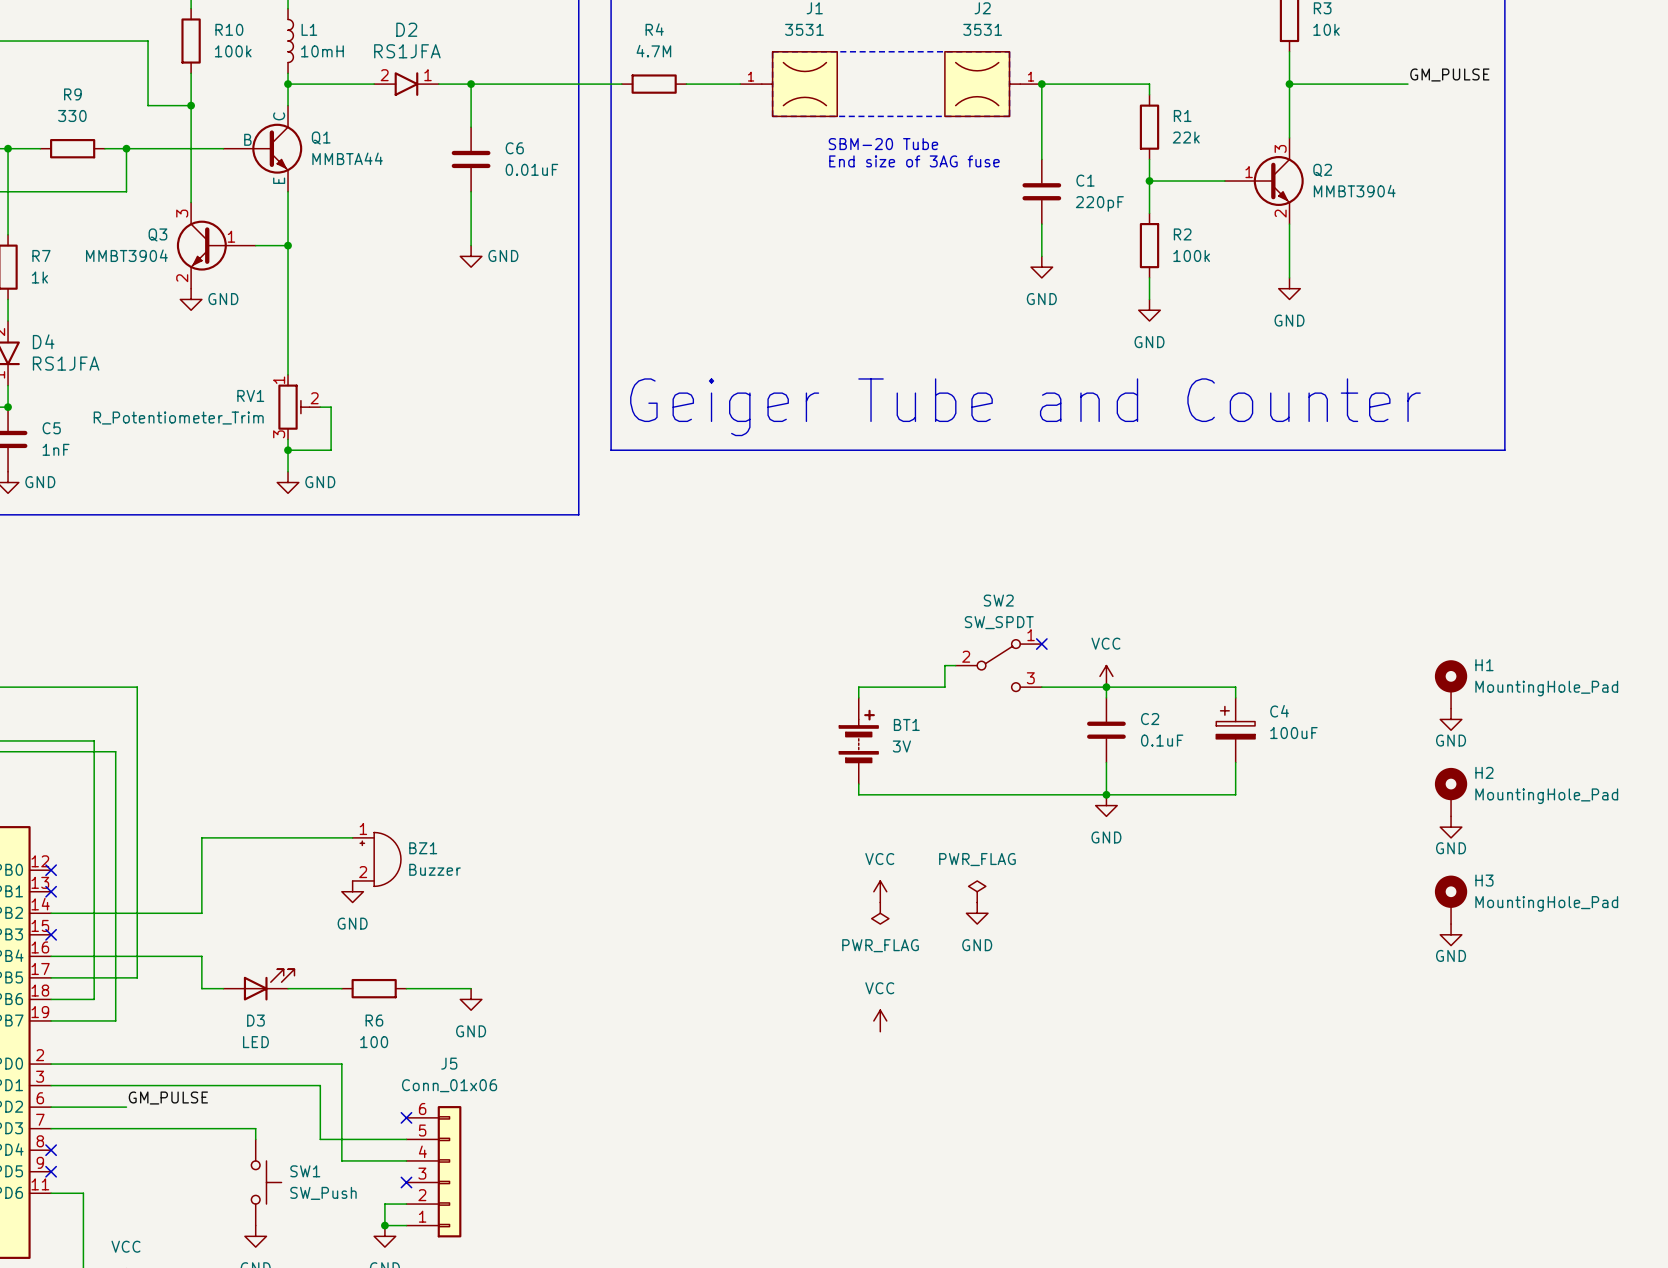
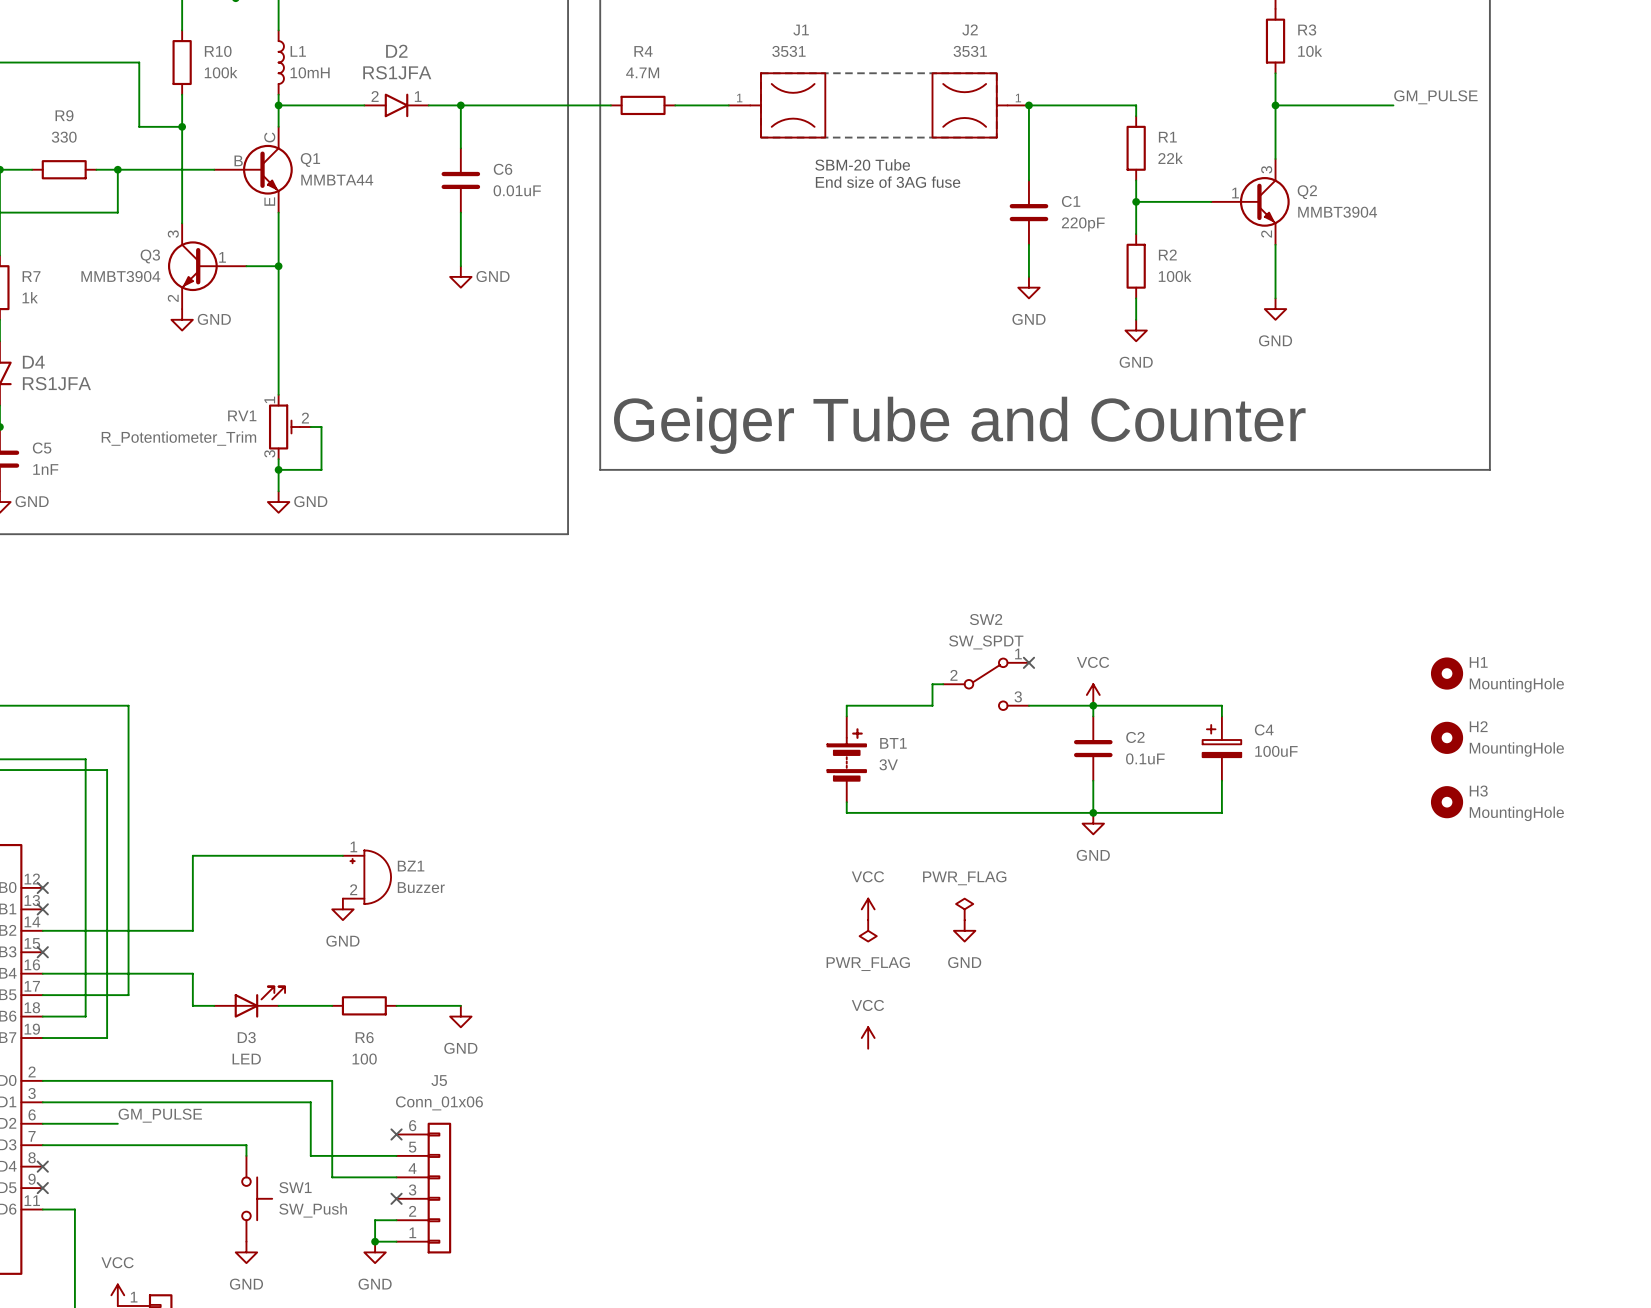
H1 symbol: [1434, 660, 1468, 709] -> [1430, 657, 1464, 690]
H1 value: MountingHole_Pad (1546, 688) -> MountingHole (1516, 685)
power symbol: GND (1451, 719) -> none
H2 symbol: [1434, 767, 1468, 817] -> [1430, 721, 1464, 754]
H2 value: MountingHole_Pad (1546, 796) -> MountingHole (1516, 749)
power symbol: GND (1451, 827) -> none
H3 symbol: [1434, 875, 1468, 925] -> [1430, 786, 1464, 819]
H3 value: MountingHole_Pad (1546, 903) -> MountingHole (1516, 813)
power symbol: GND (1451, 934) -> none

